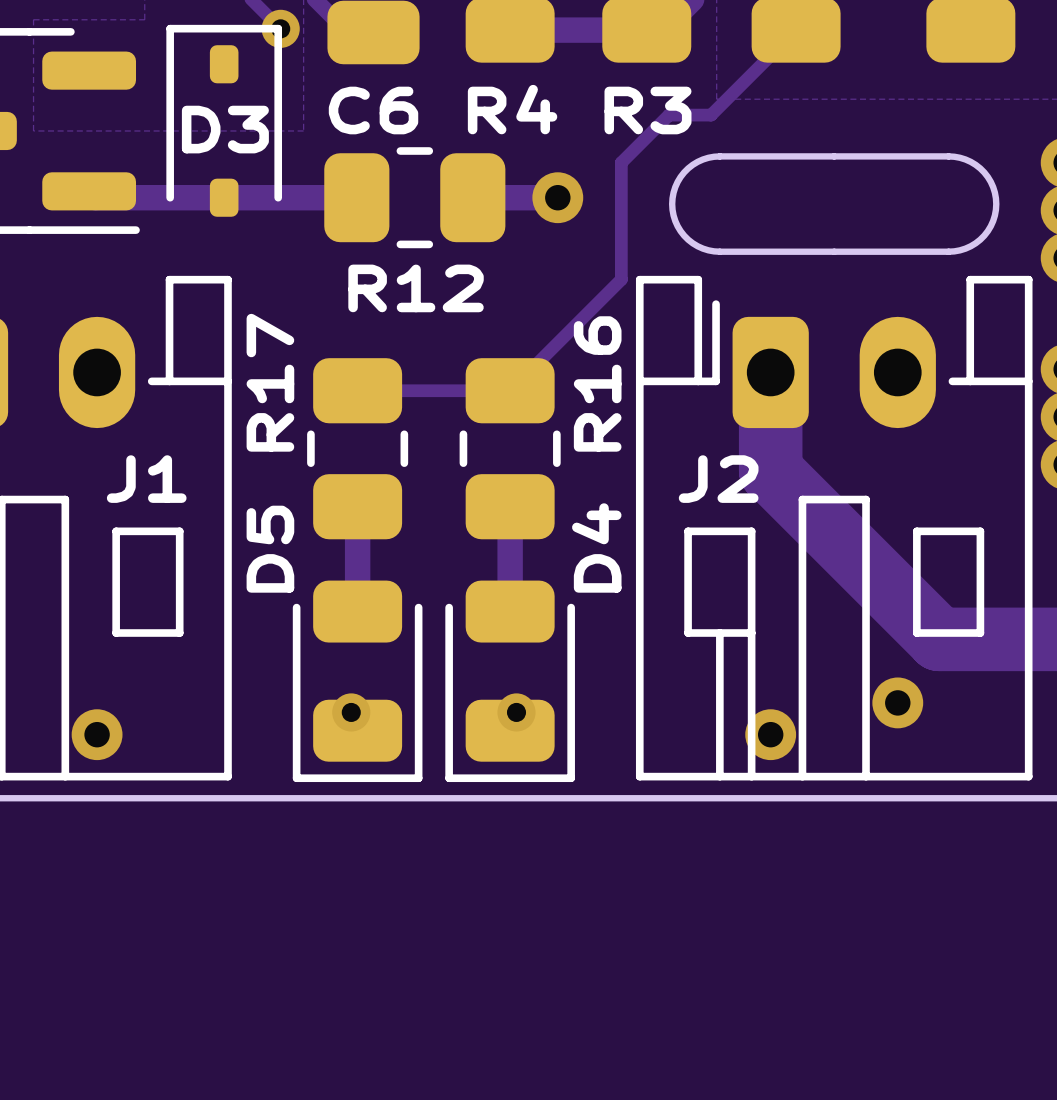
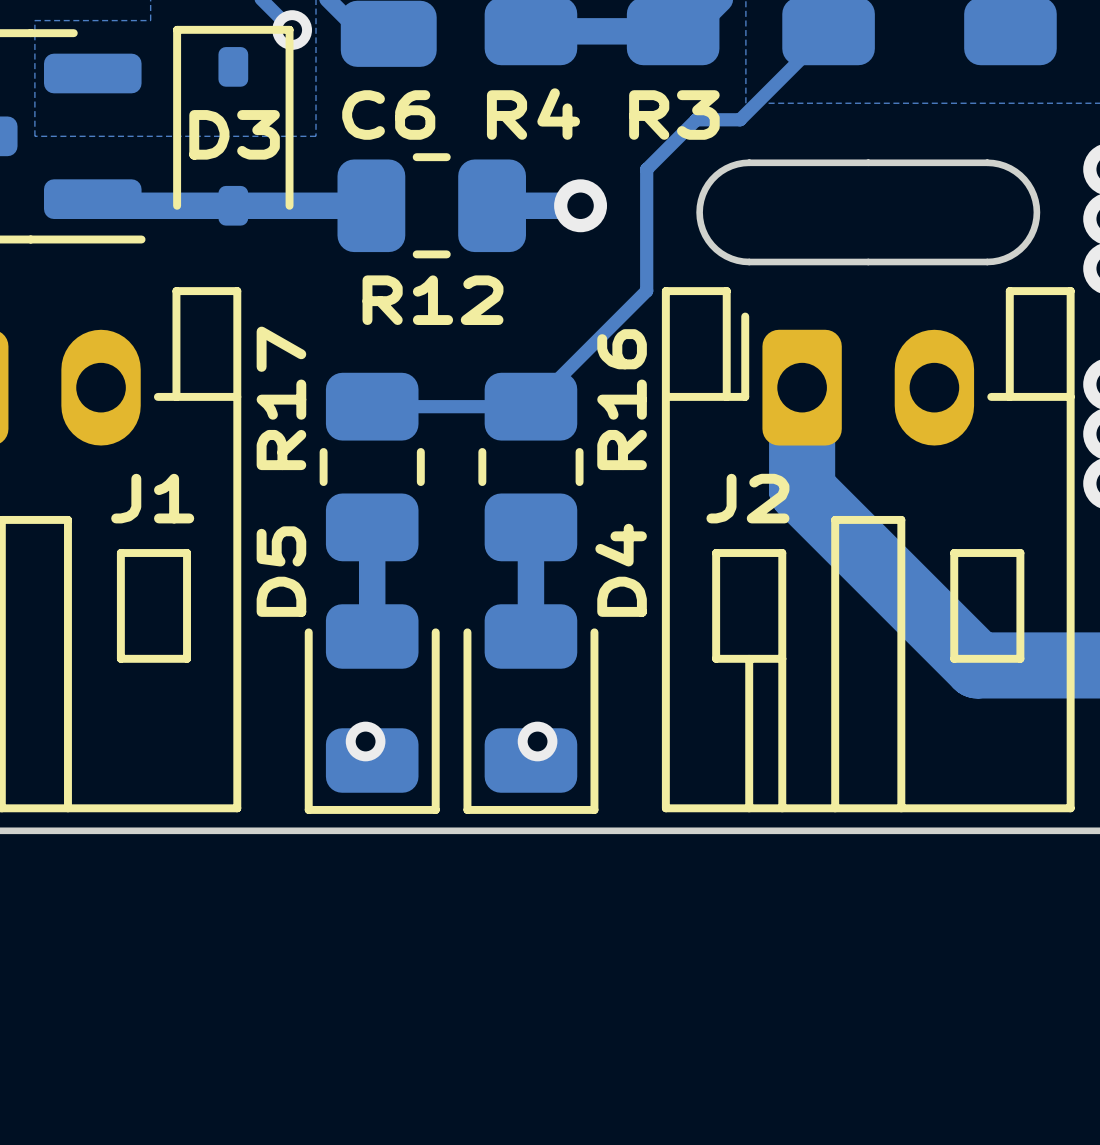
via: (897, 702) -> none
via: (97, 734) -> none
via: (770, 734) -> none

